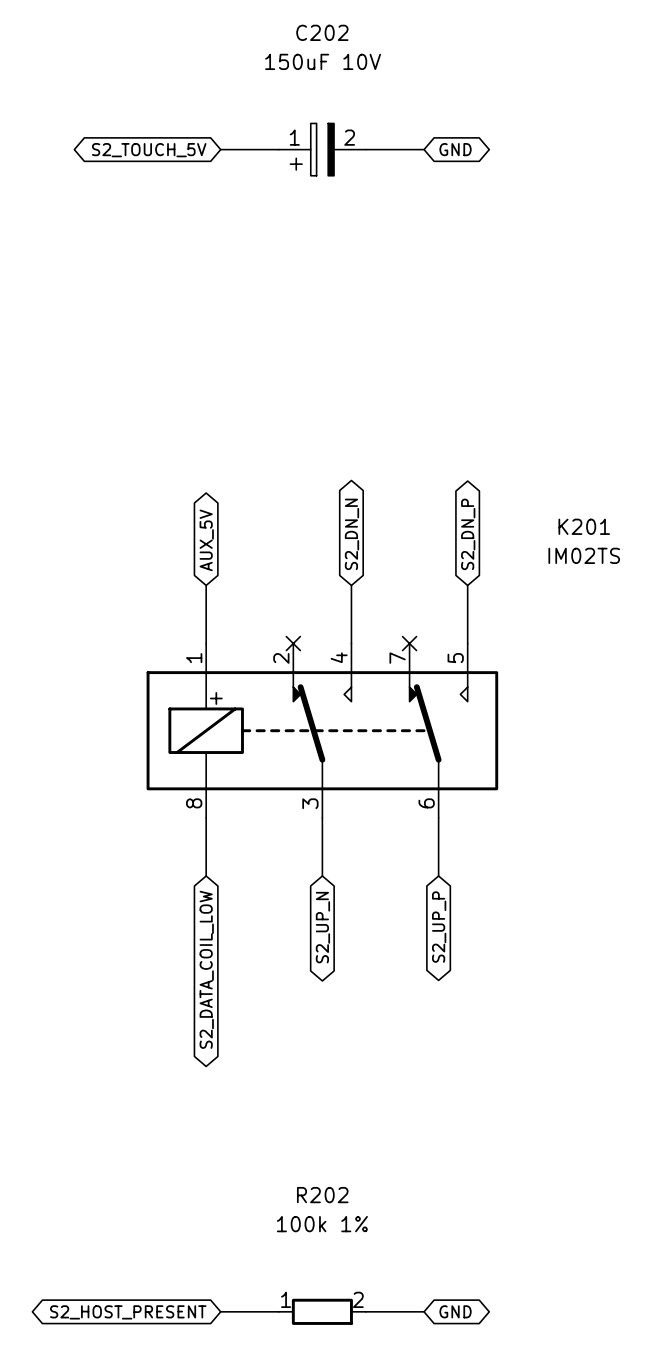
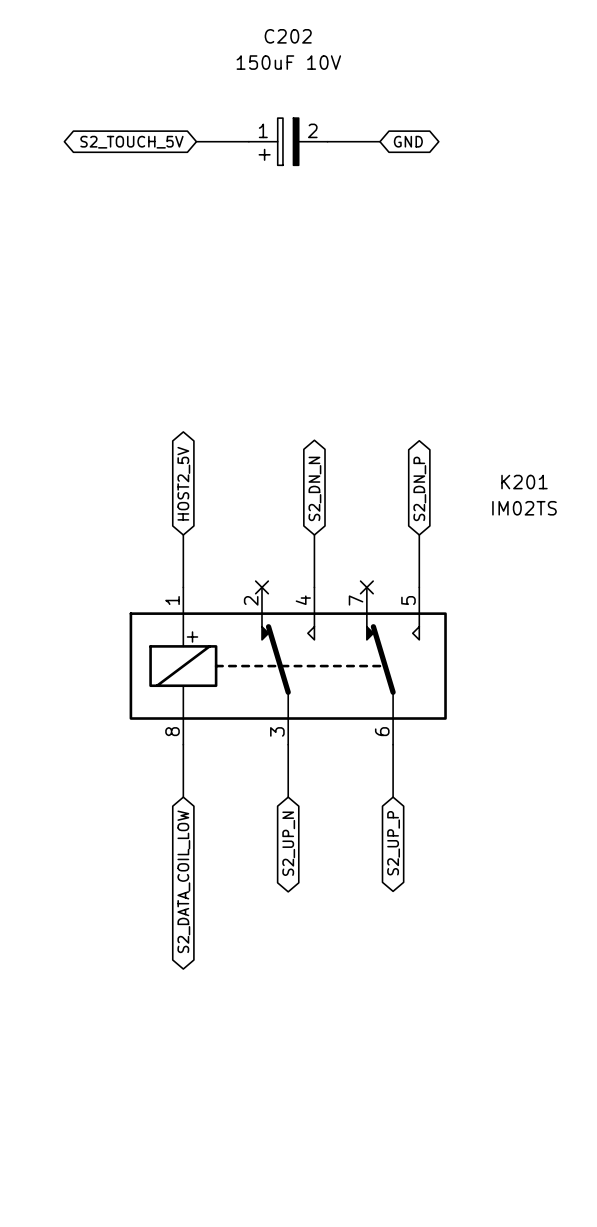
global label: AUX_5V (206, 540) -> HOST2_5V (183, 483)
wire: (220, 1311) (278, 1311) -> none
R202: 100k 1% (322, 1311) -> none
wire: (365, 1311) (424, 1311) -> none
global label: GND (455, 1311) -> none
global label: S2_HOST_PRESENT (128, 1312) -> none

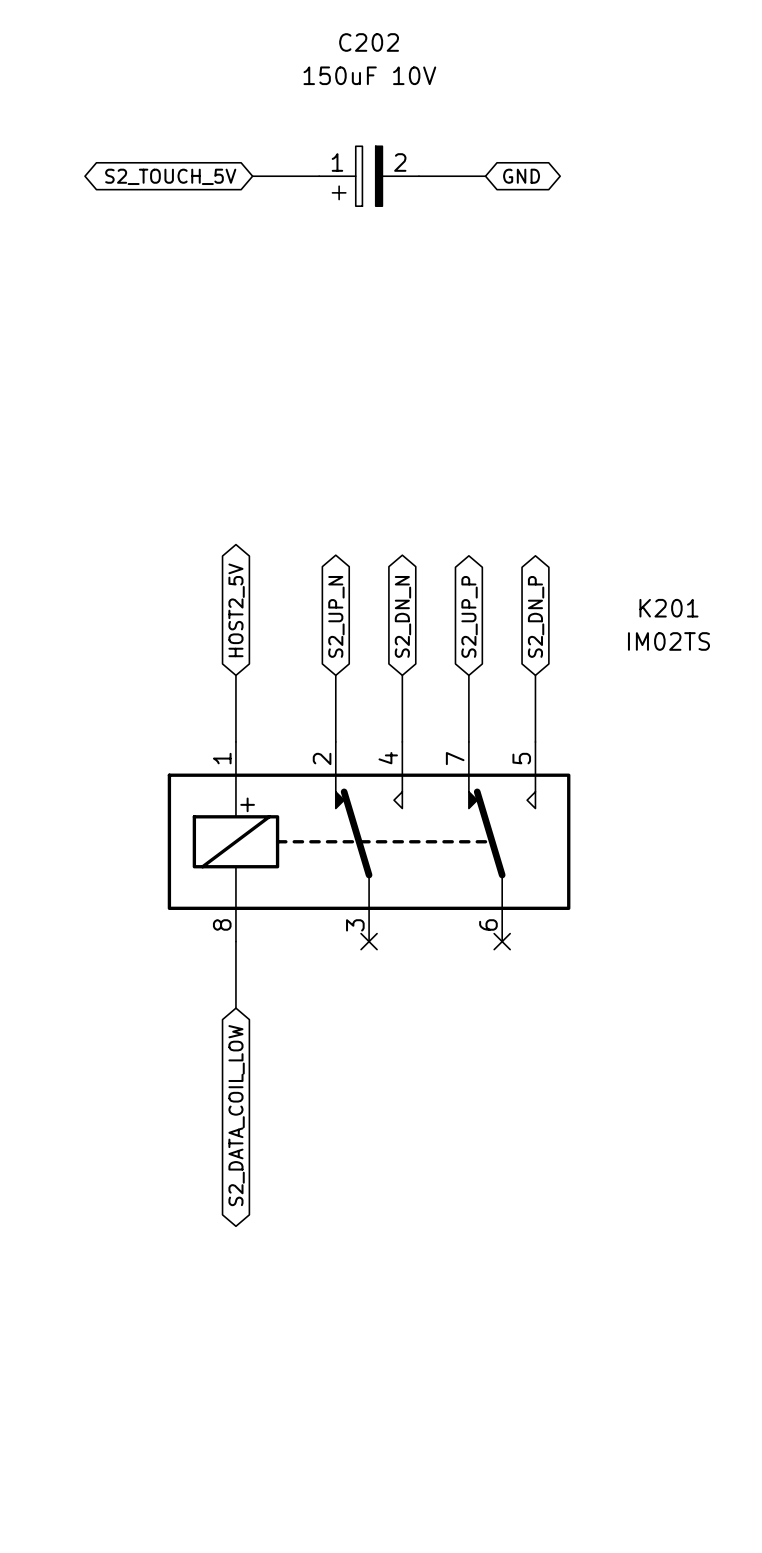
global label: none -> S2_UP_N (336, 616)
global label: none -> S2_UP_P (469, 616)
no-connect mark: (261, 587) -> none
no-connect mark: (366, 587) -> none
wire: (288, 744) (288, 797) -> (335, 675) (335, 741)
no-connect mark: none -> (369, 941)
wire: (393, 744) (393, 797) -> (468, 675) (468, 741)
no-connect mark: none -> (502, 941)
global label: S2_UP_N (288, 843) -> none
global label: S2_UP_P (393, 843) -> none

